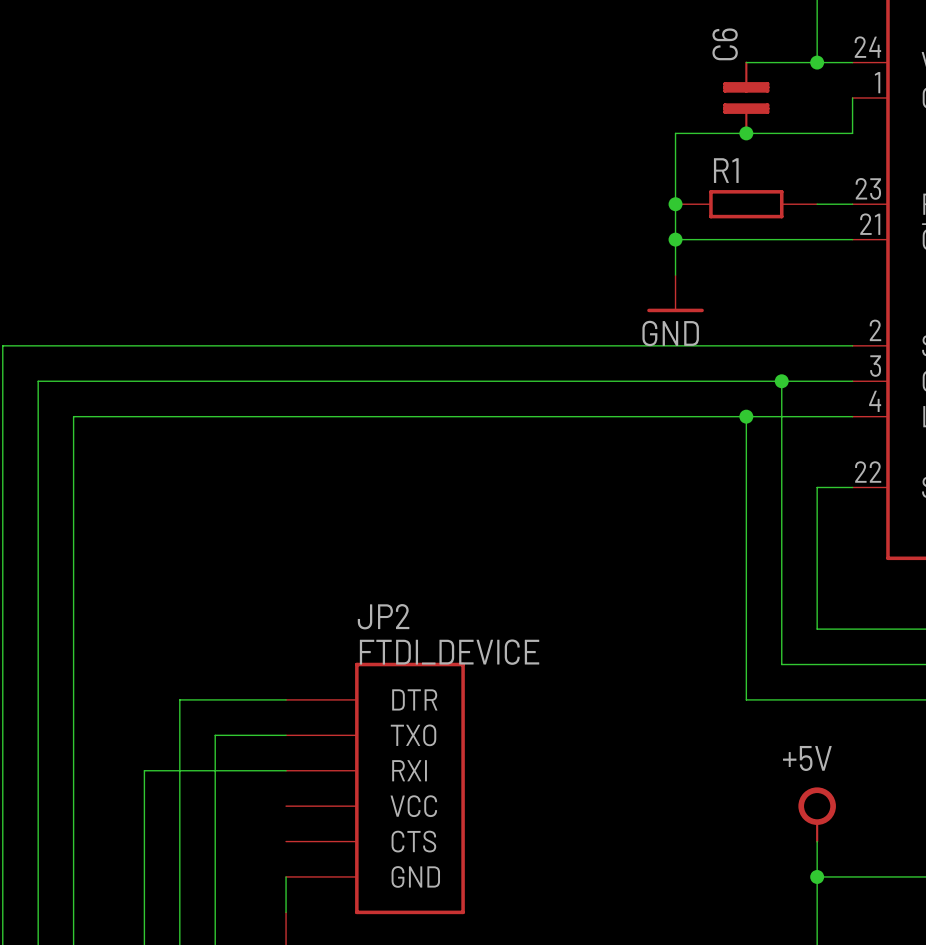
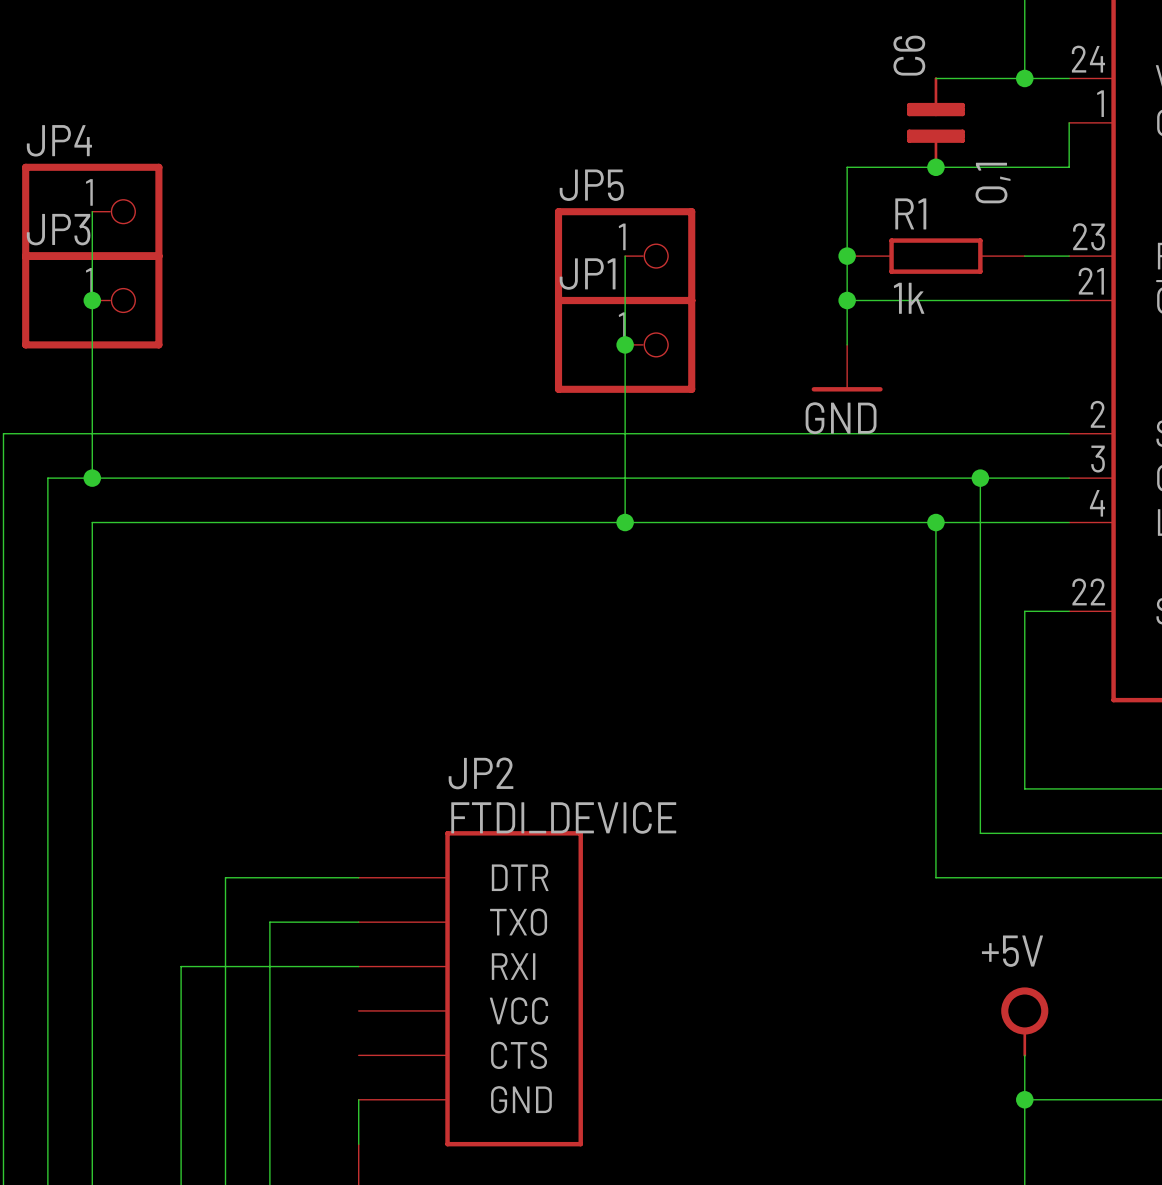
C6 value: none -> 0,1 (993, 183)
wire: none -> (92, 211) (92, 478)
JP4: none -> (92, 211)
wire: none -> (625, 256) (625, 522)
JP5: none -> (625, 256)
R1 value: none -> 1k (909, 298)
JP3: none -> (92, 300)
junction: none -> (92, 300)
JP1: none -> (625, 344)
junction: none -> (625, 344)
junction: none -> (92, 478)
junction: none -> (625, 522)

